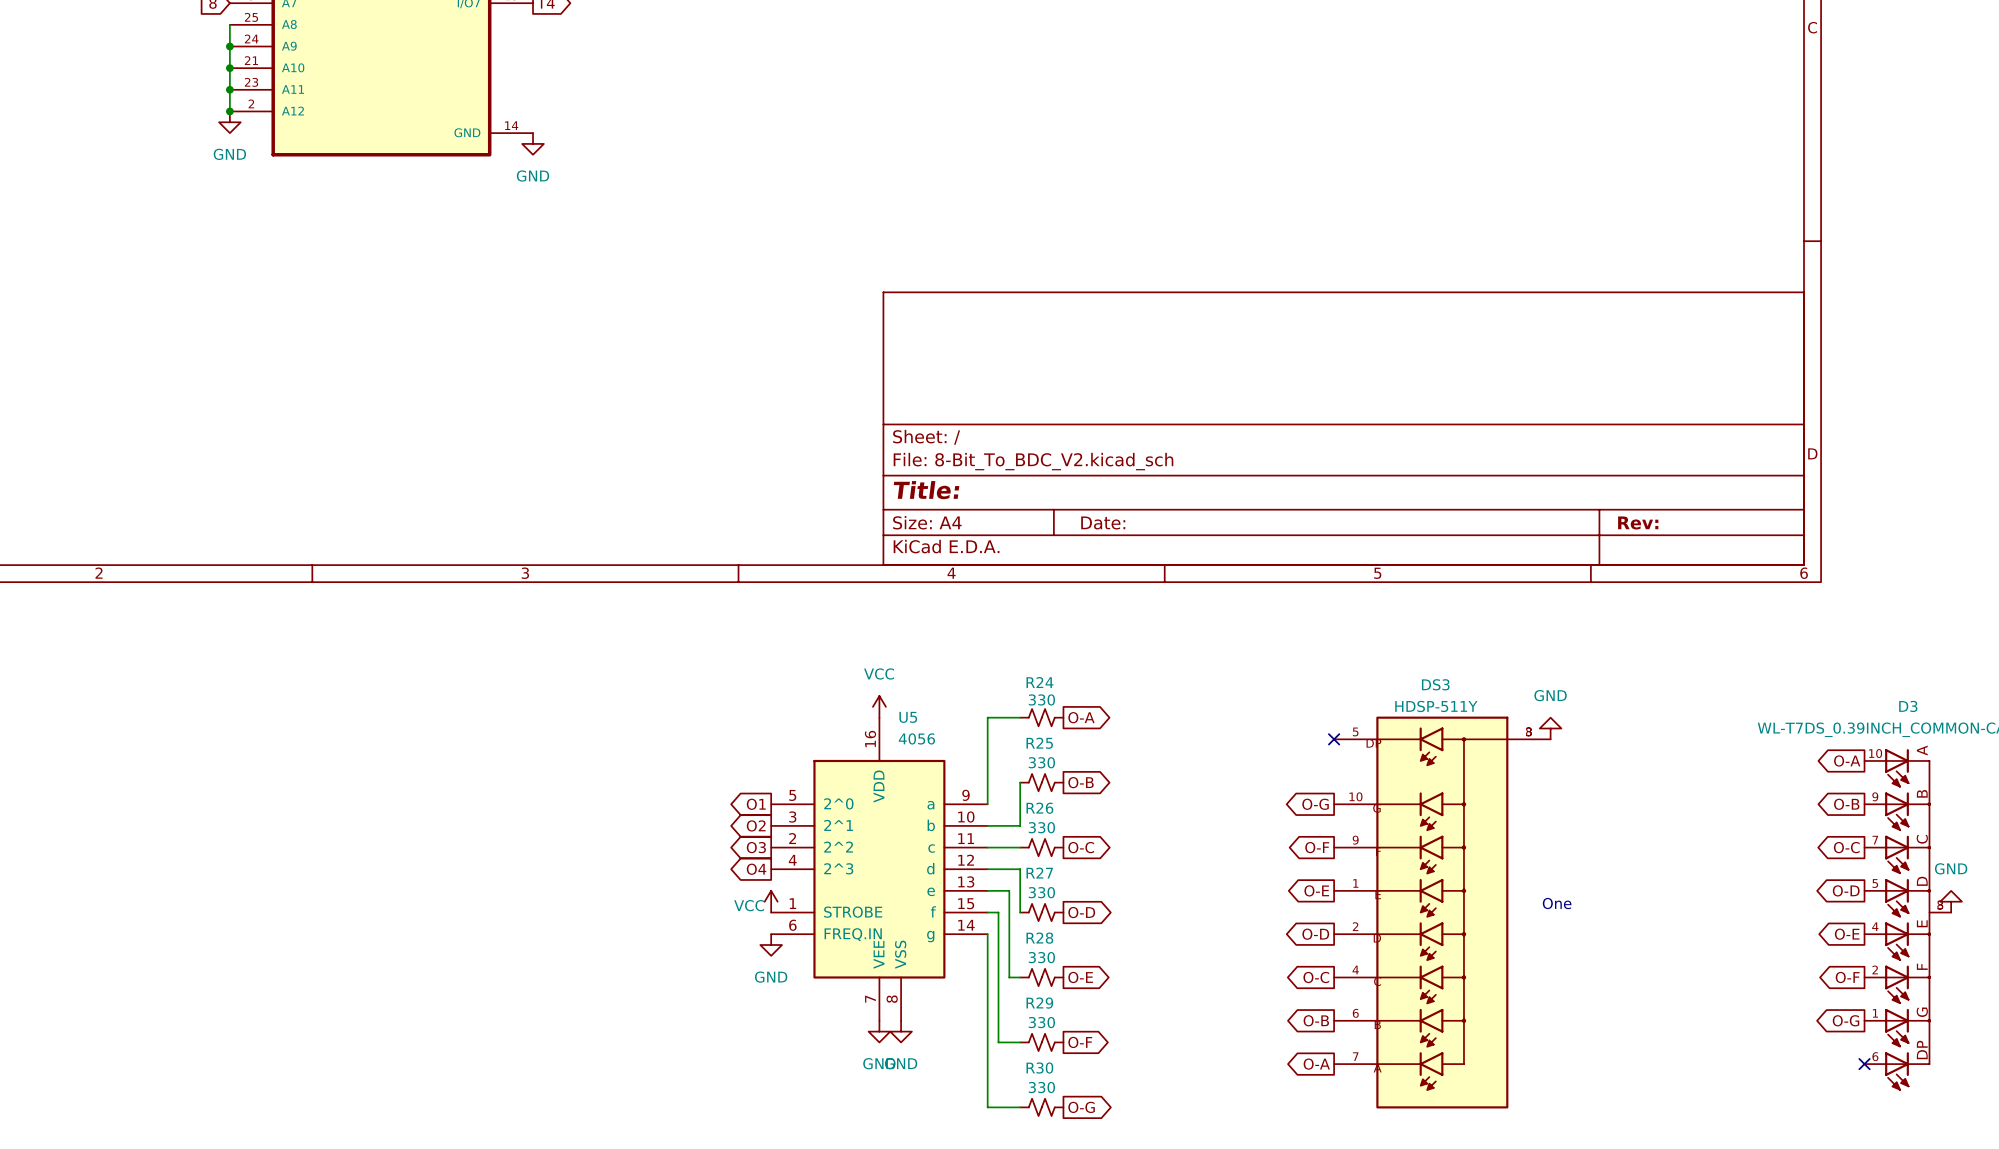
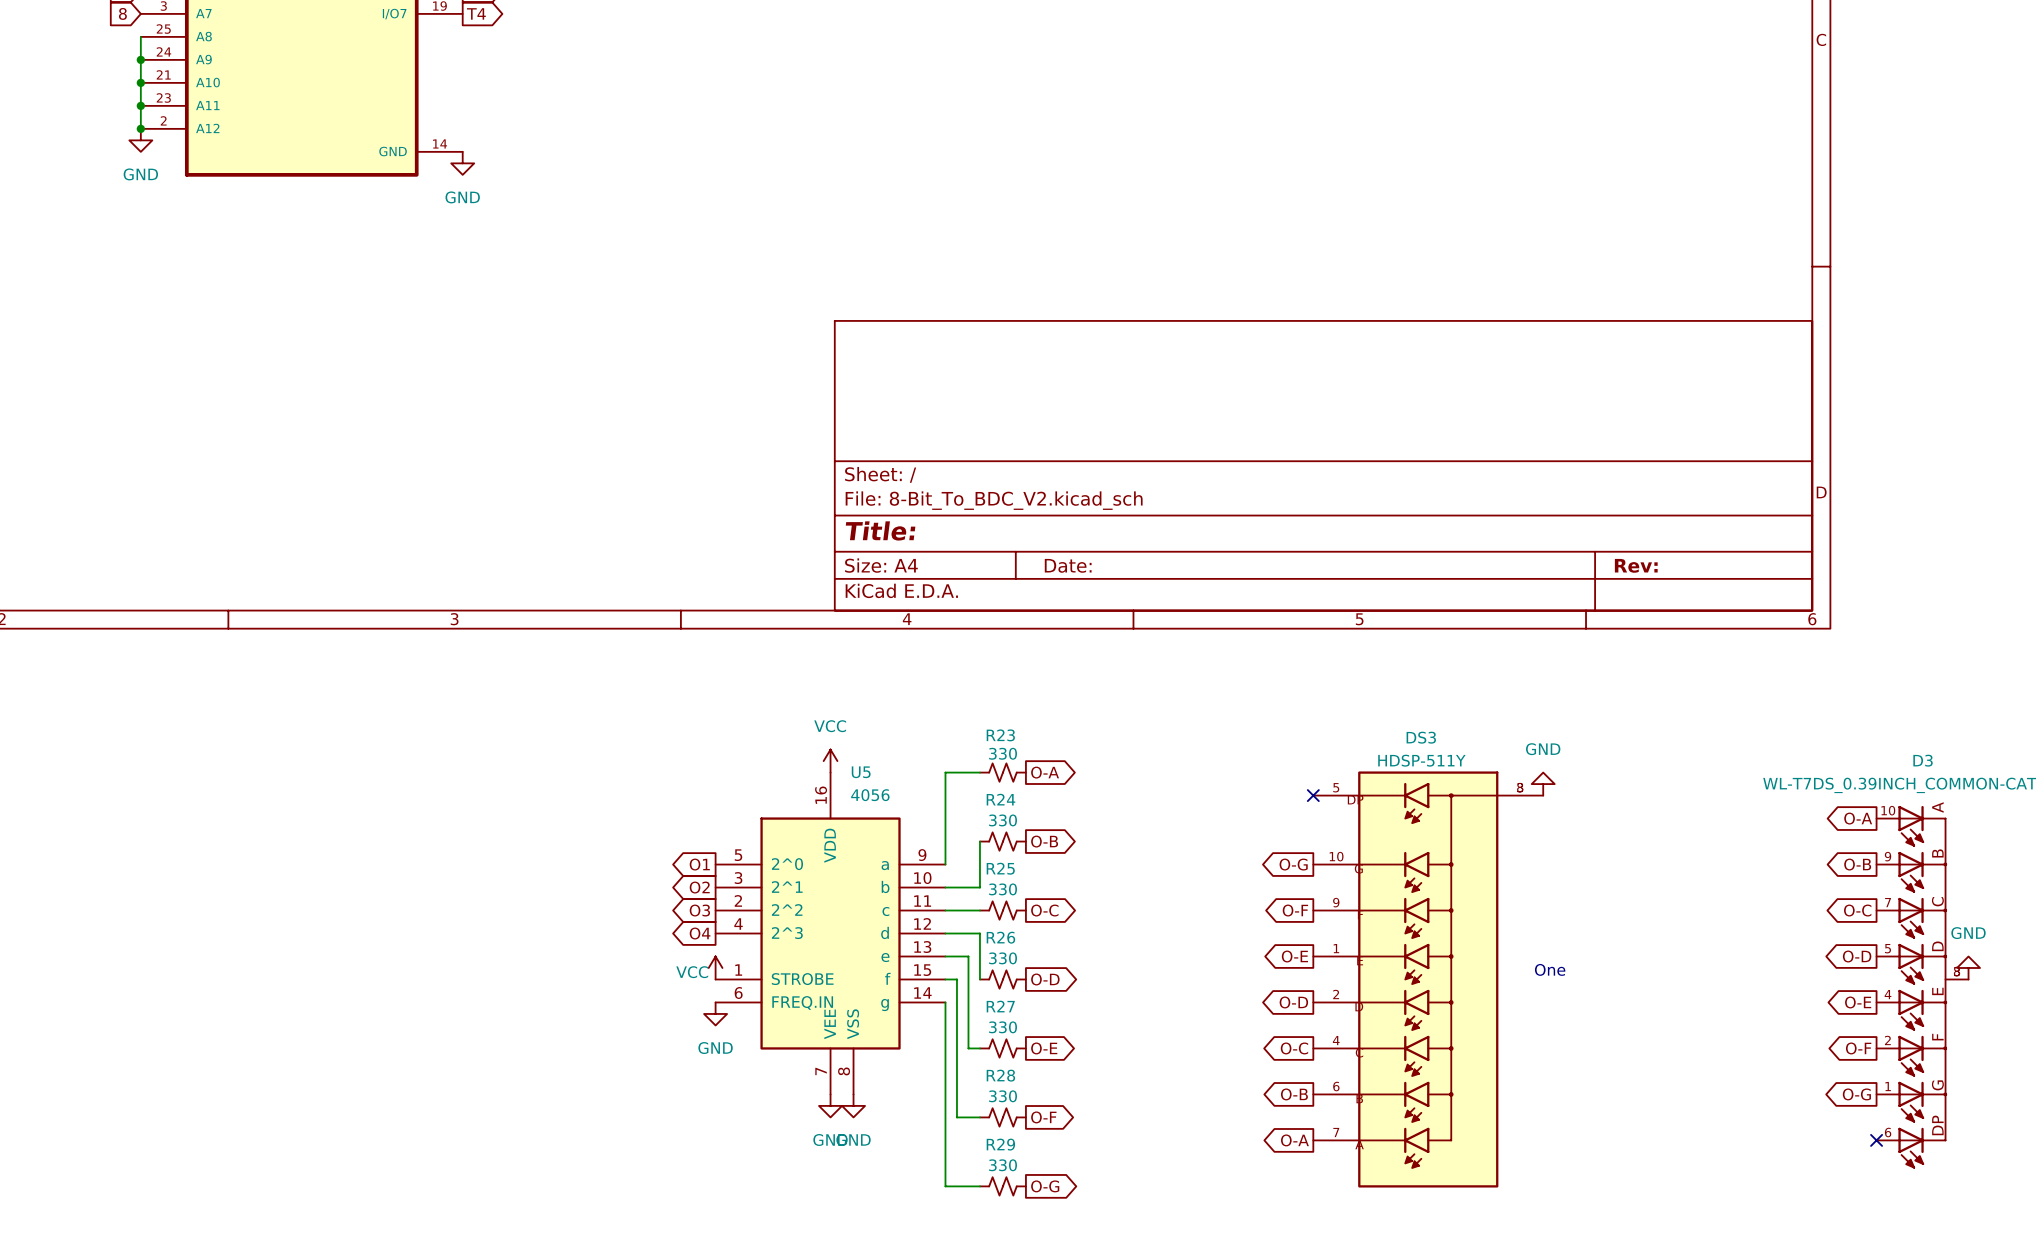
R24 name: R24 (1039, 682) -> R23 (1000, 735)
R25 name: R25 (1039, 743) -> R24 (1000, 799)
R26 name: R26 (1039, 808) -> R25 (1000, 868)
R27 name: R27 (1039, 873) -> R26 (1000, 937)
R28 name: R28 (1039, 938) -> R27 (1000, 1006)
R29 name: R29 (1039, 1003) -> R28 (1000, 1075)
R30 name: R30 (1039, 1068) -> R29 (1000, 1144)

